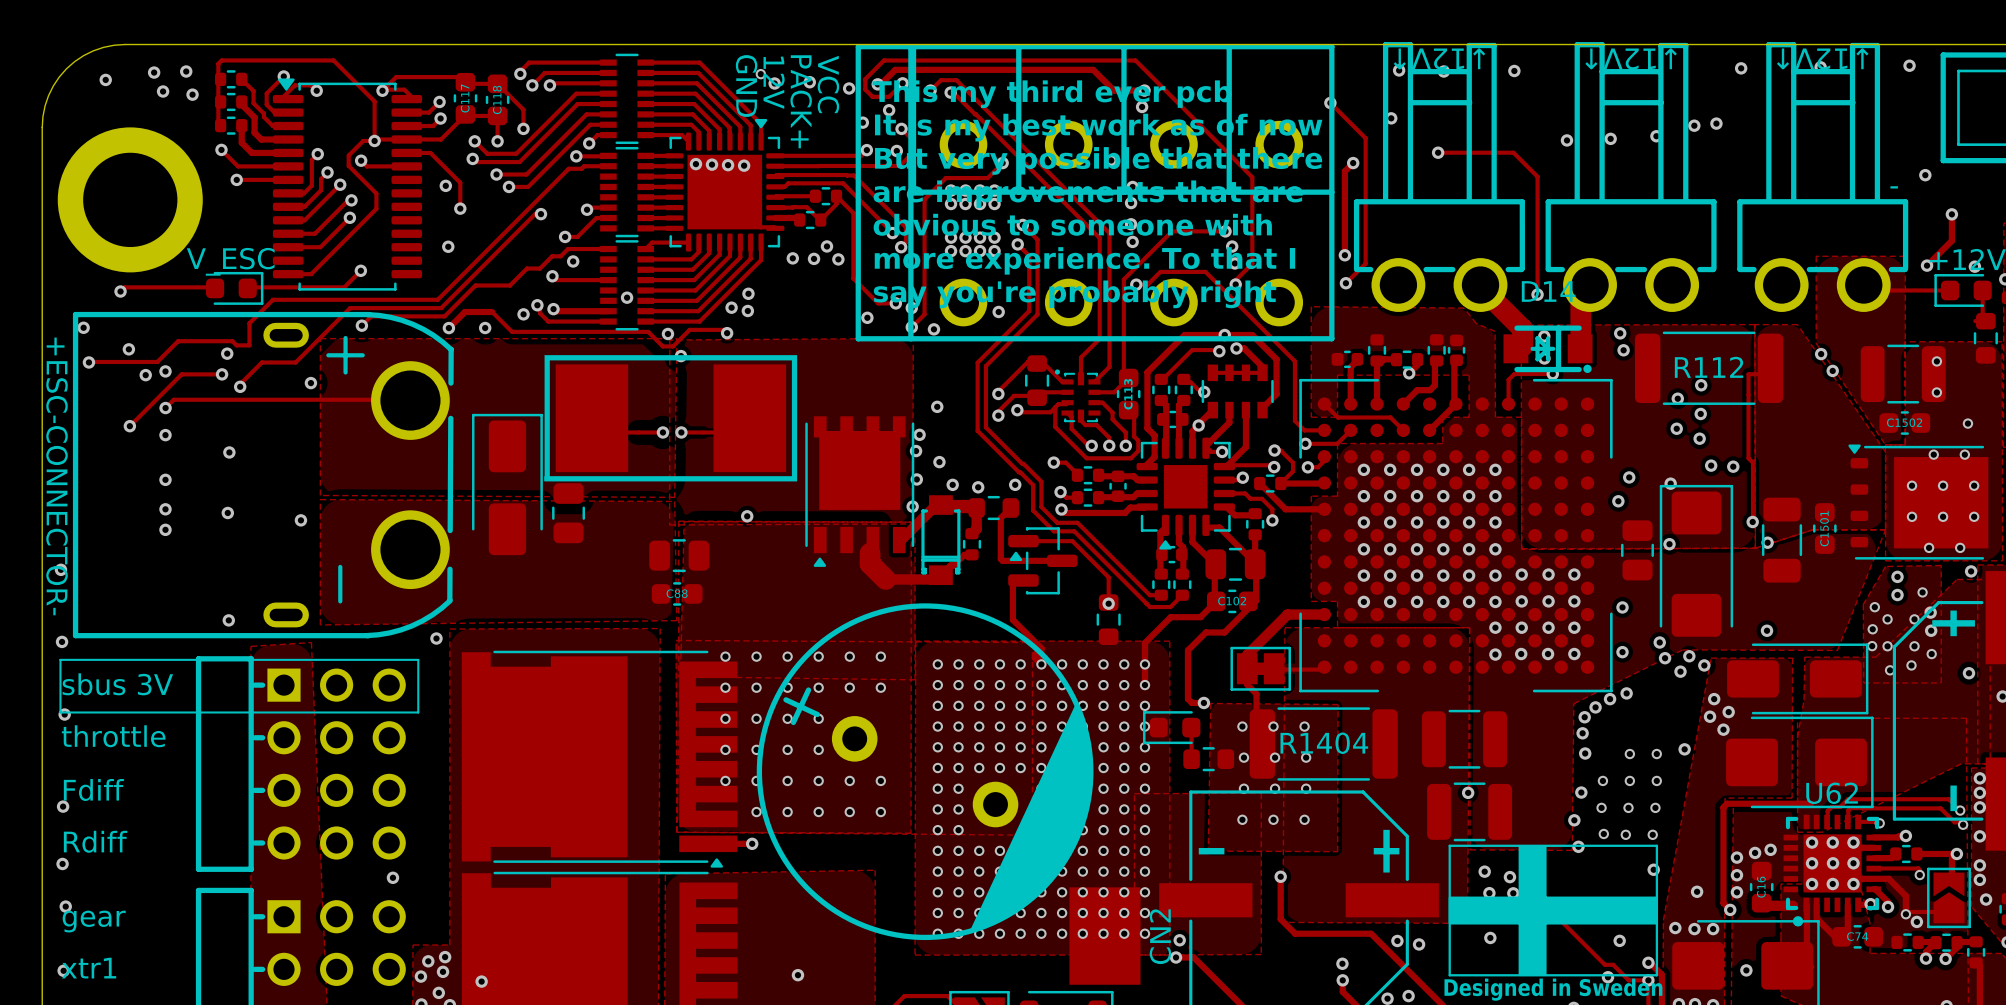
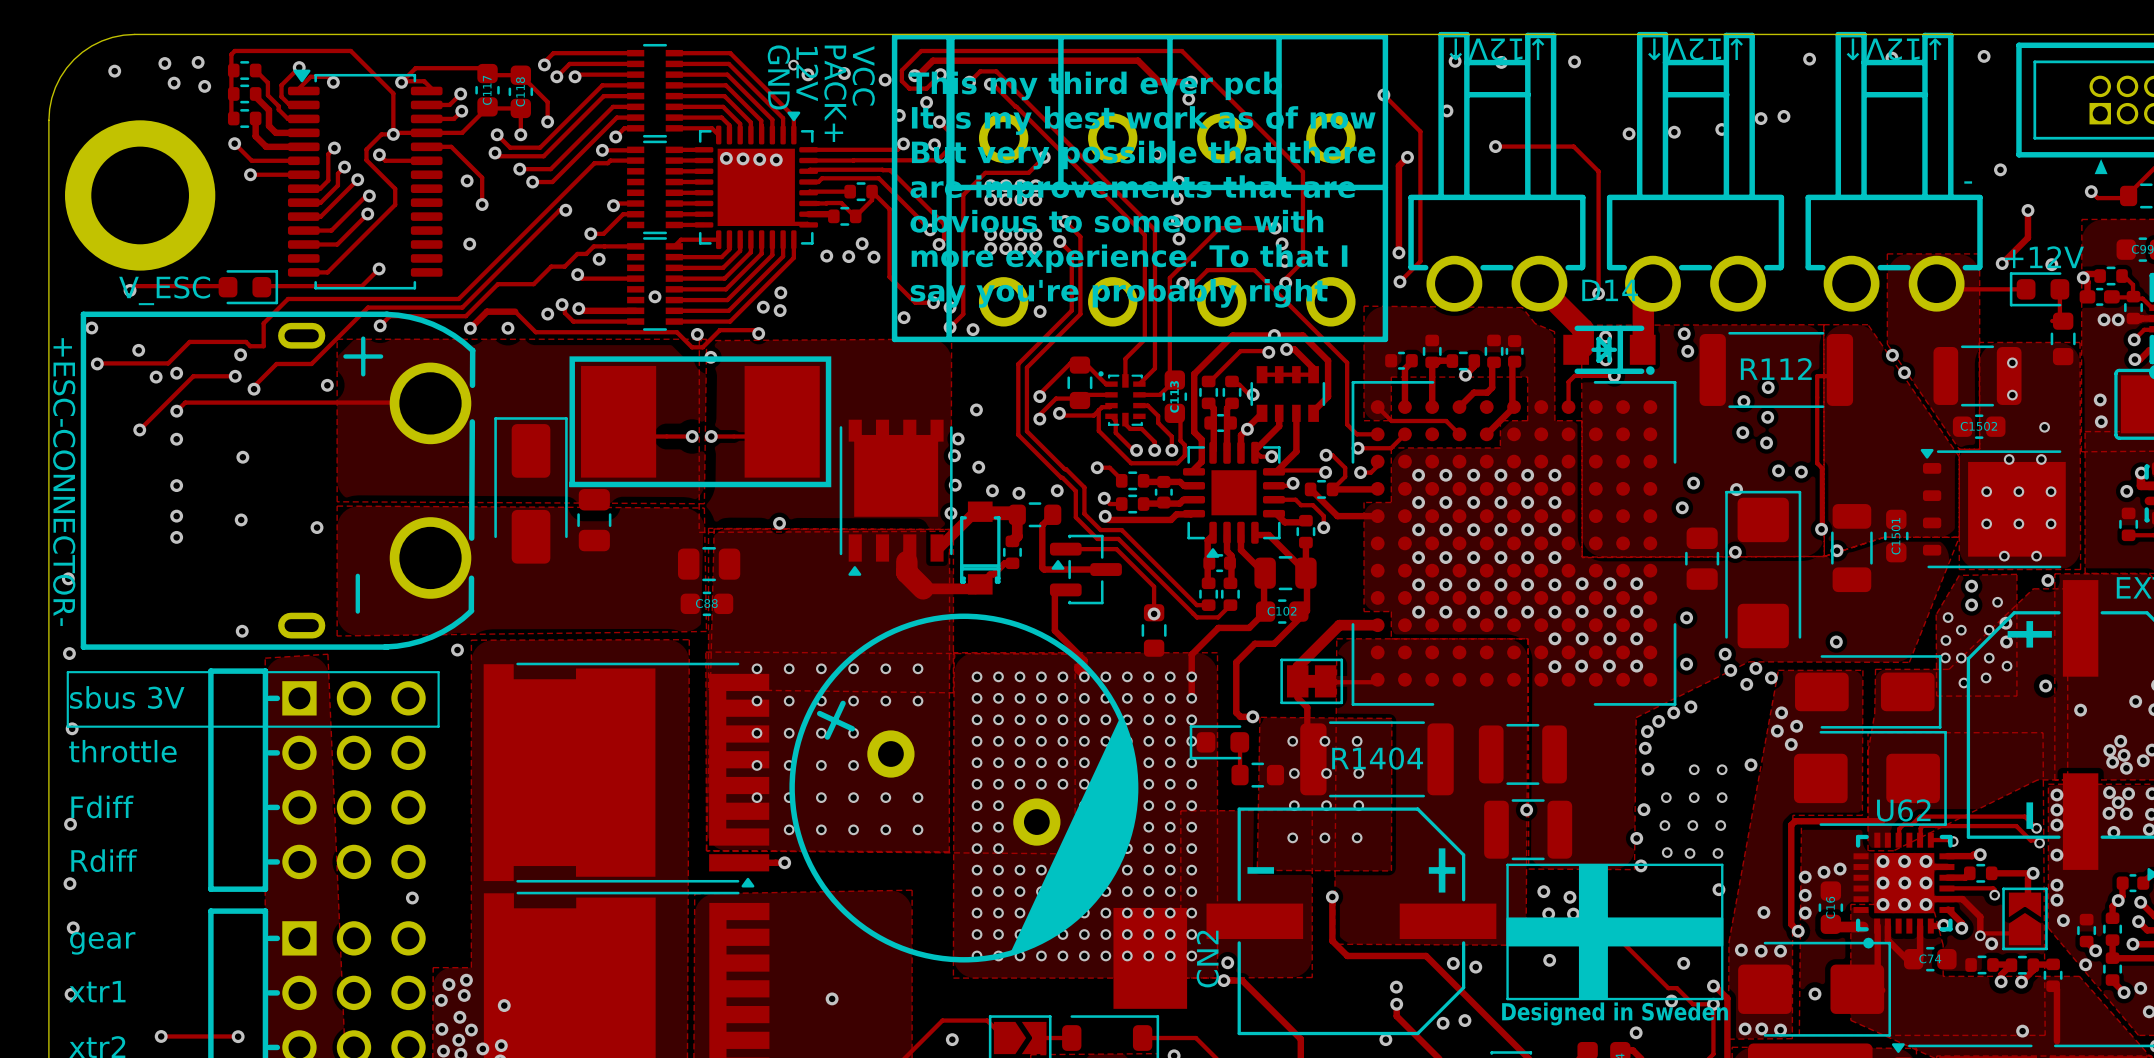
part text position: V_ESC (230, 261) -> V_ESC (164, 290)

